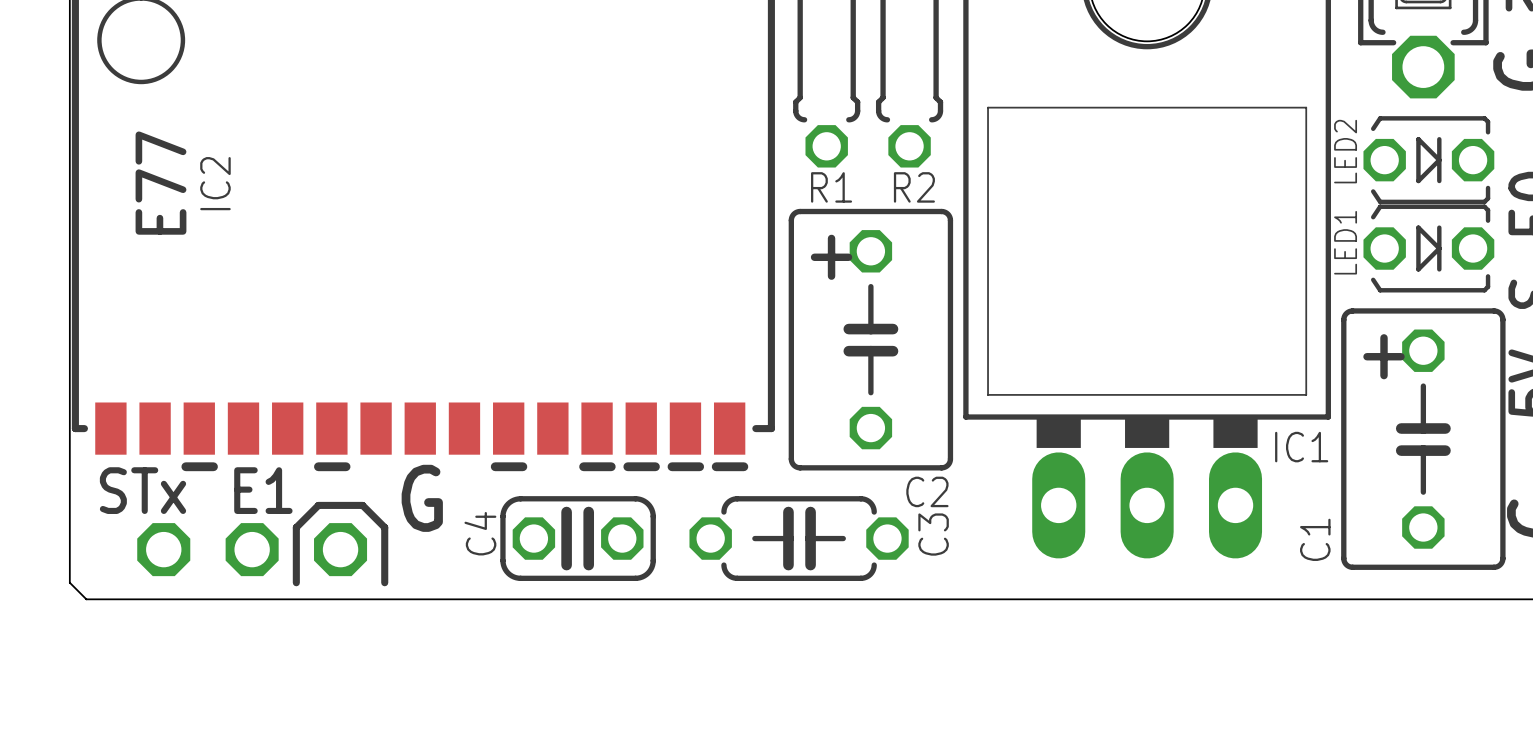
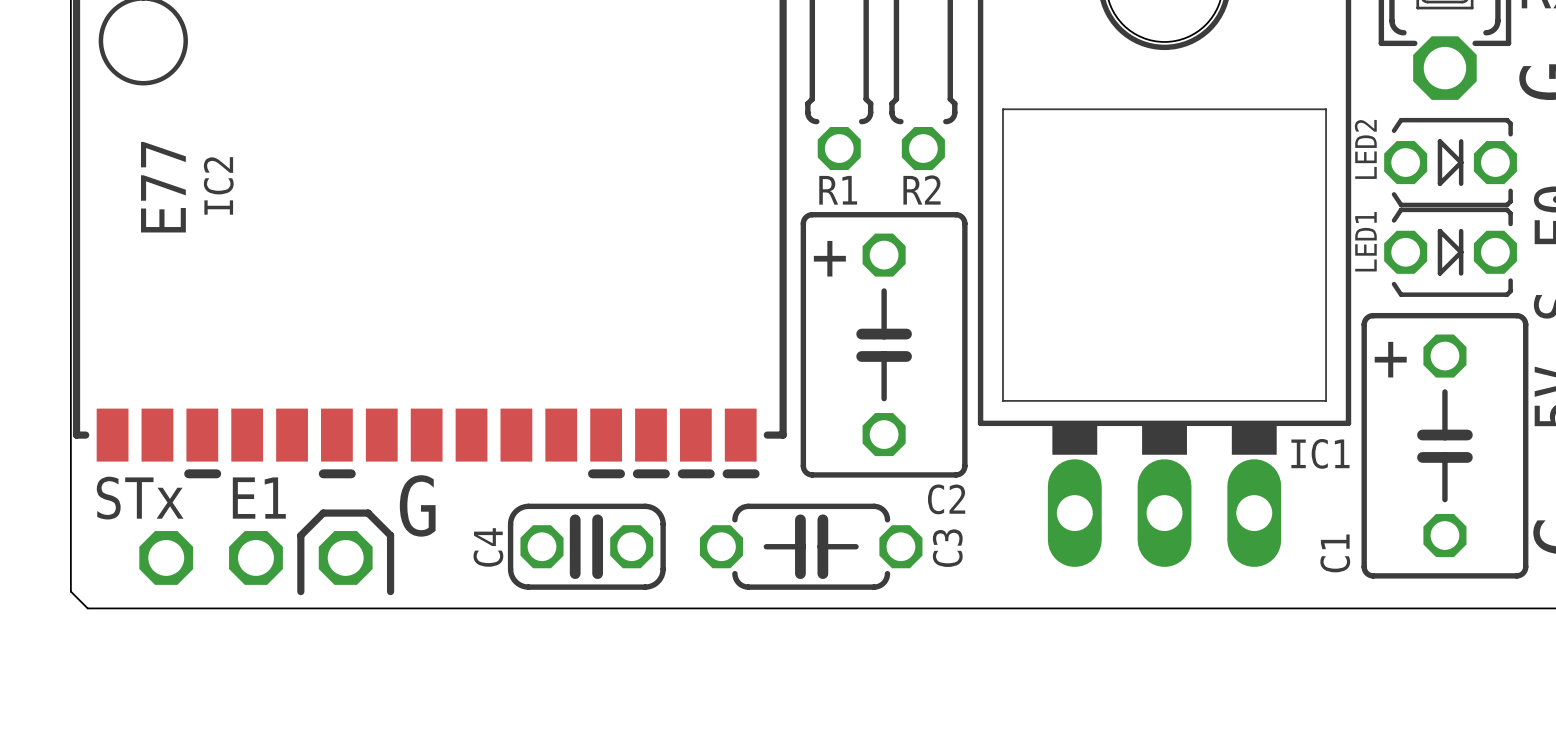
line: (495, 466) (522, 466) -> none

